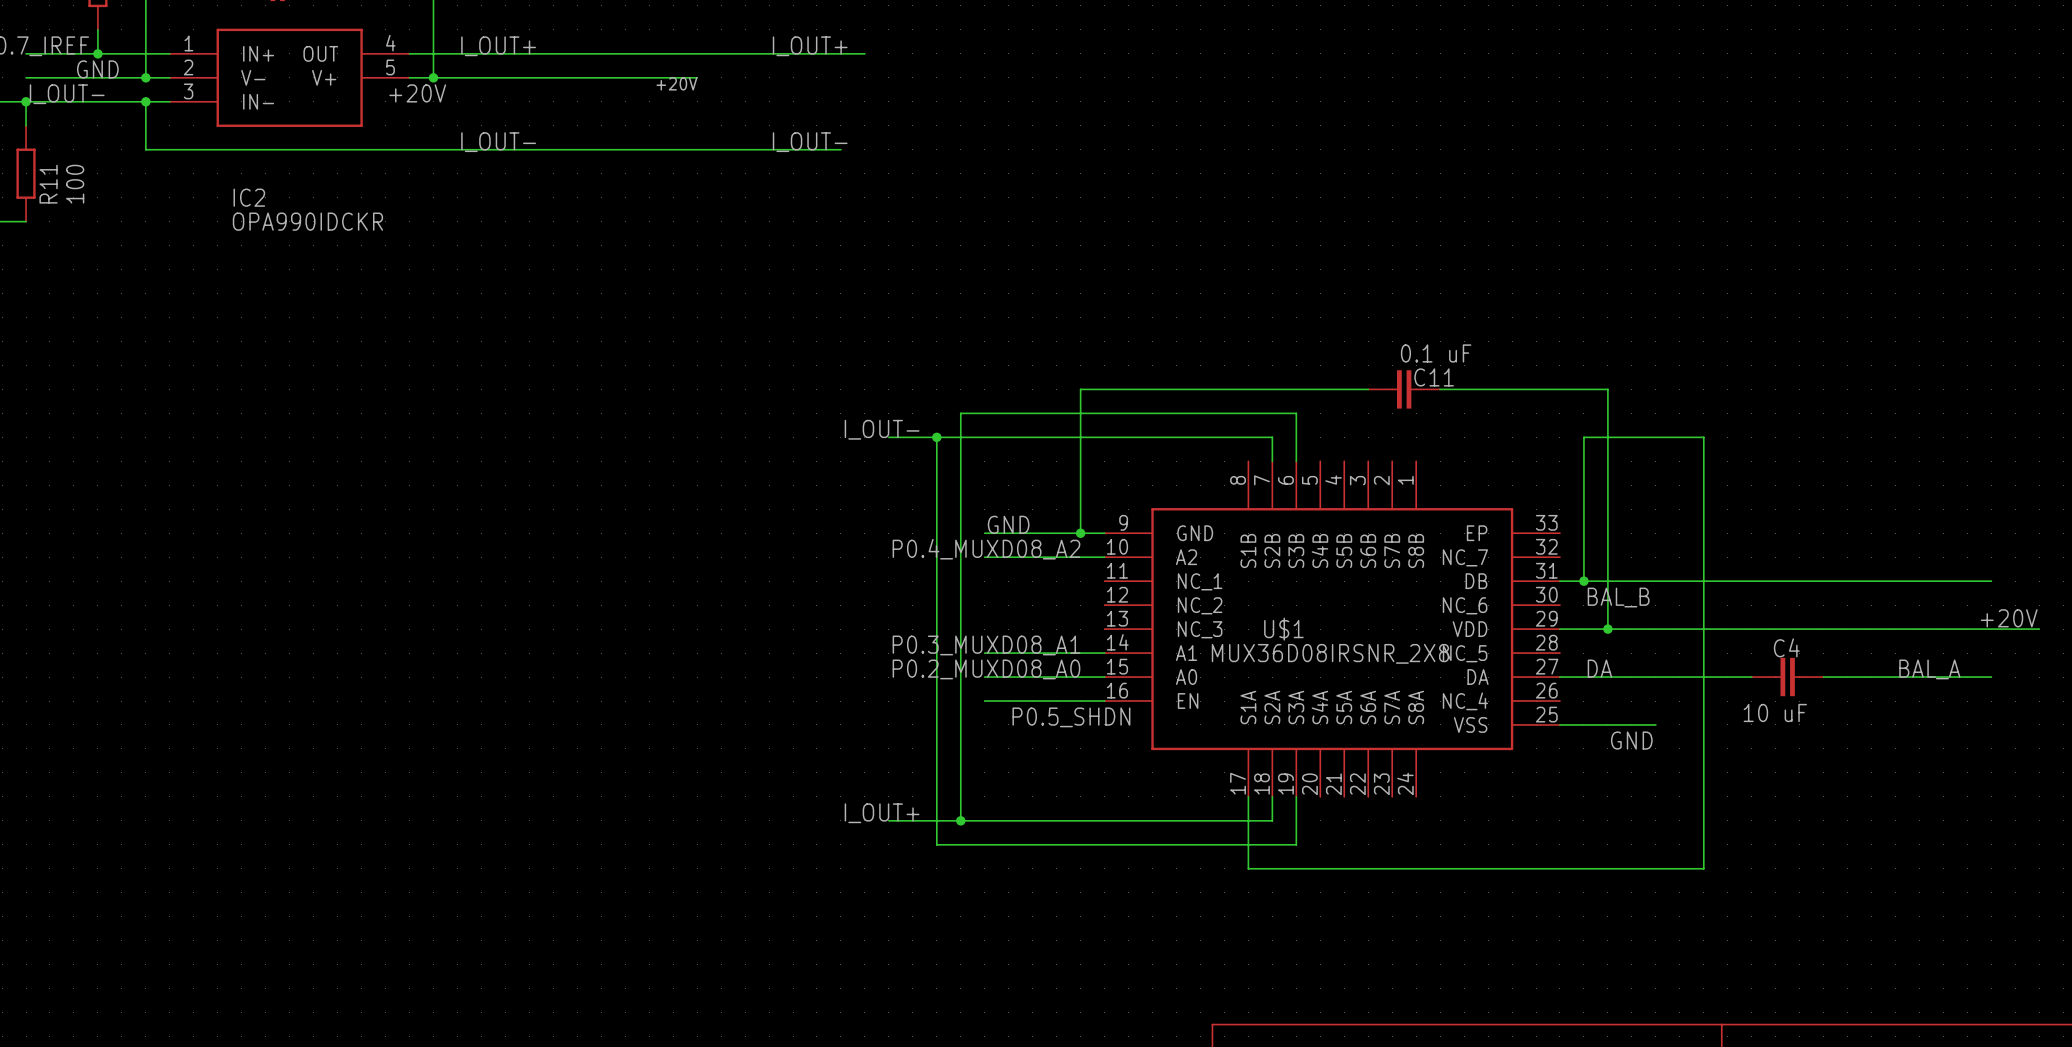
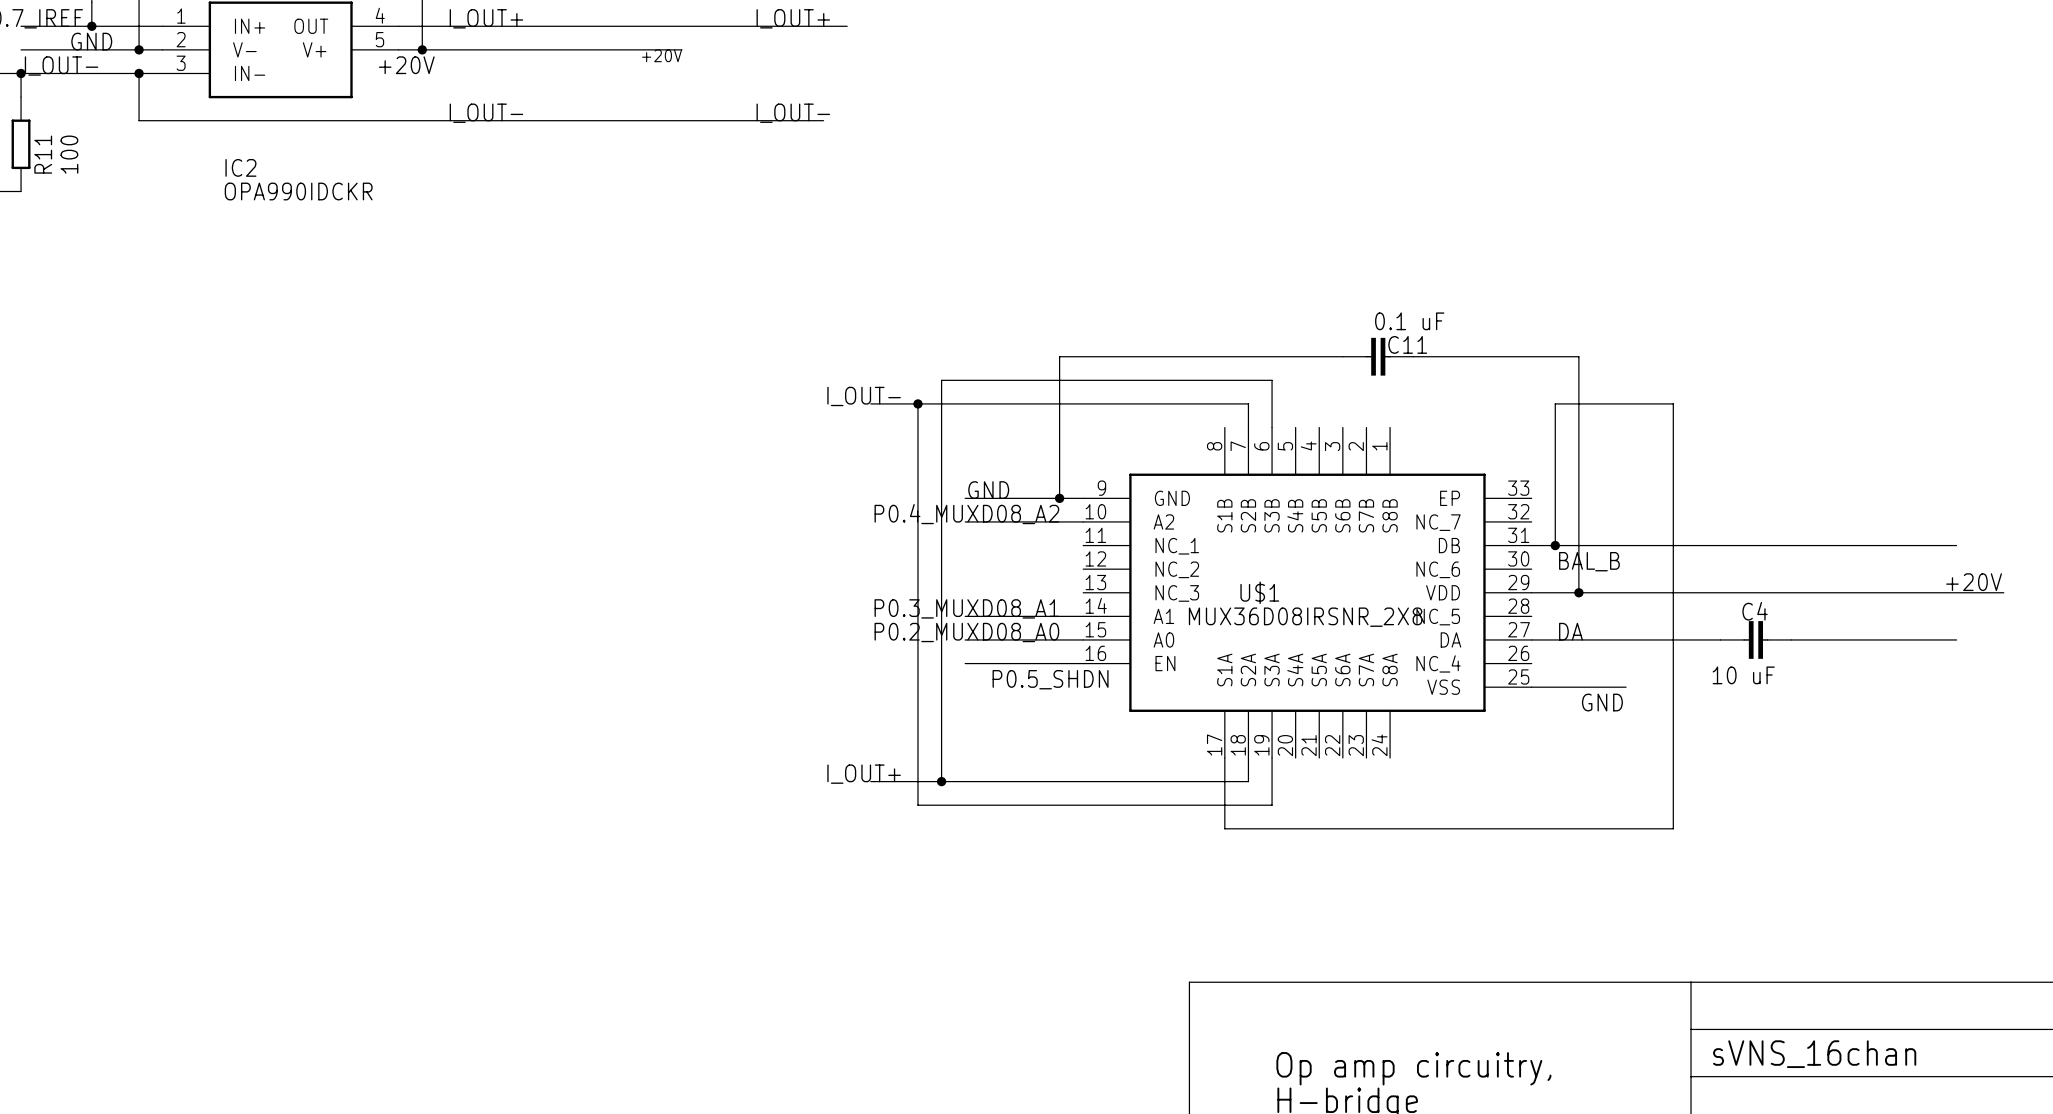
label: BAL_A (1929, 669) -> none

